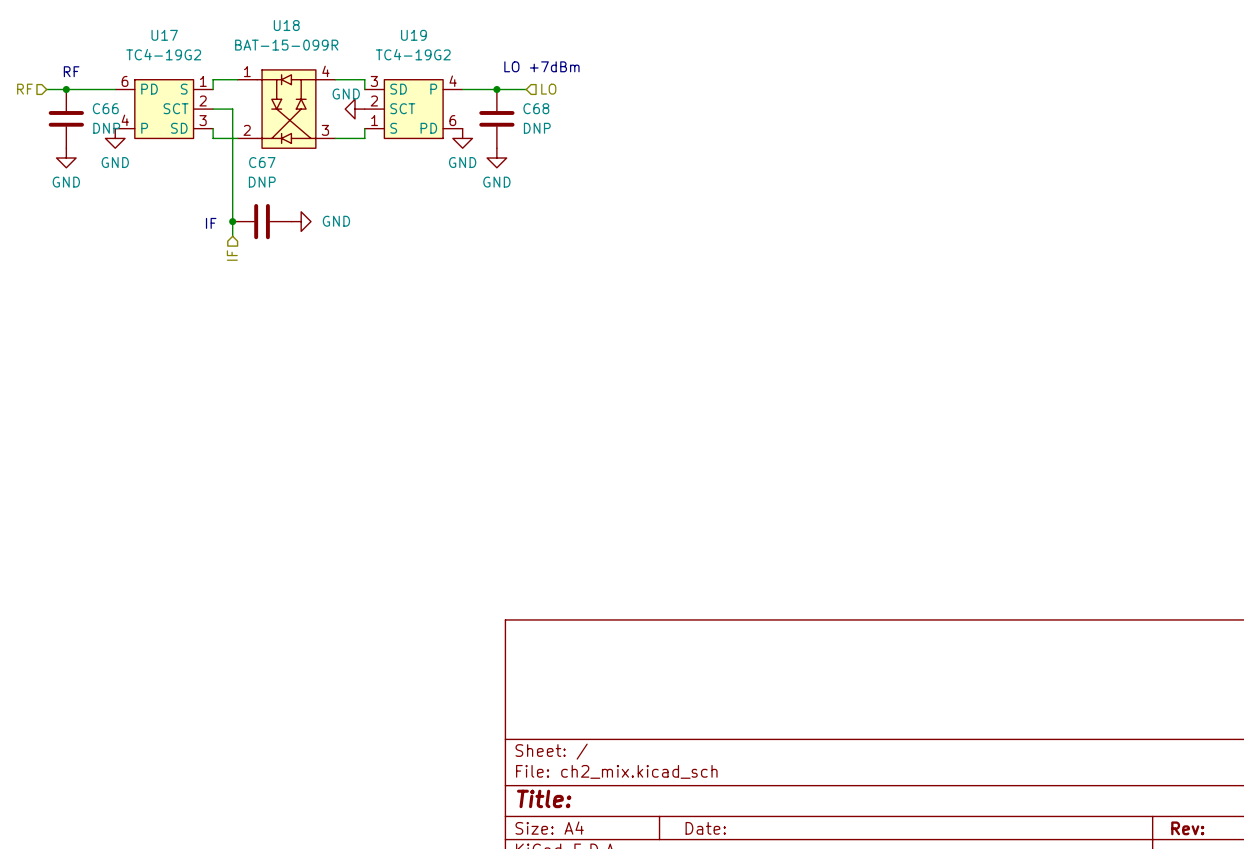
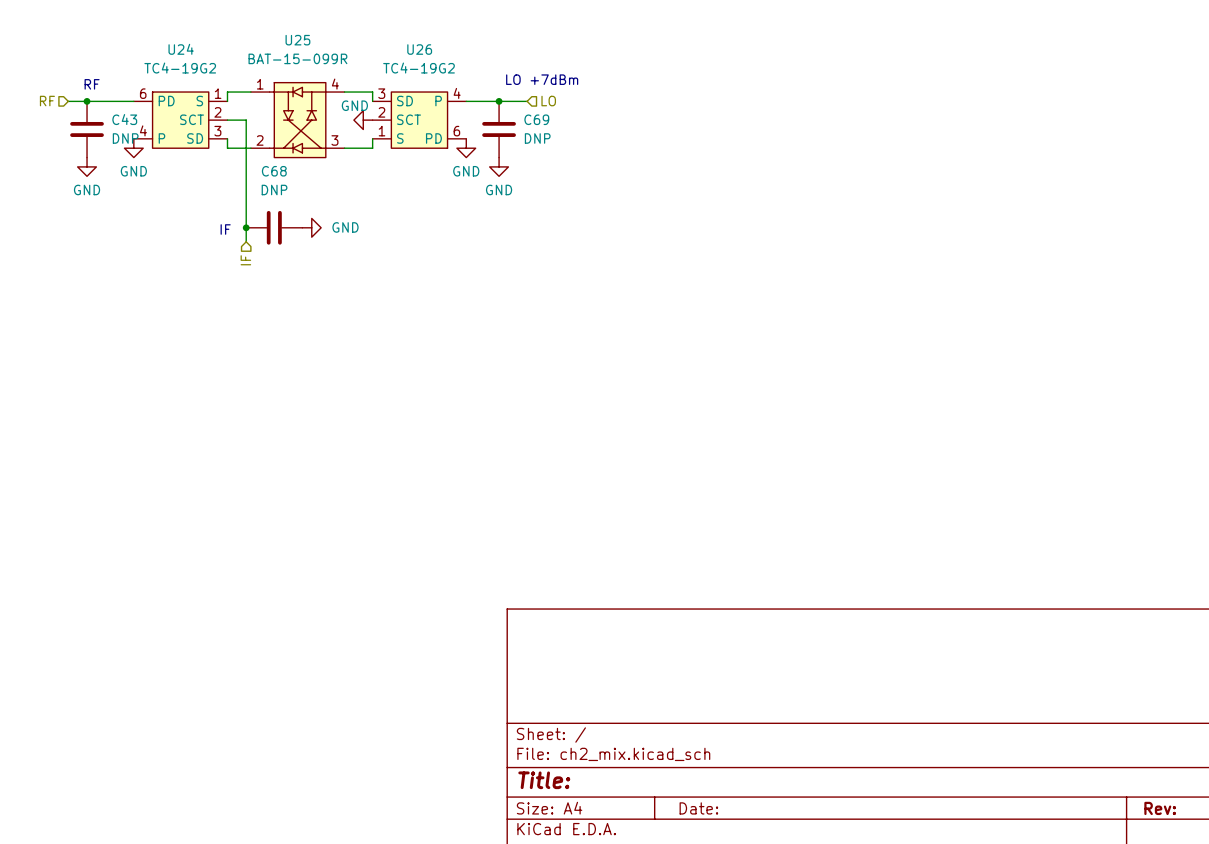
U18 name: U18 (286, 25) -> U25 (297, 40)
U17 name: U17 (164, 35) -> U24 (181, 49)
U19 name: U19 (413, 35) -> U26 (419, 49)
C66 name: C66 (105, 108) -> C43 (124, 119)
C68 name: C68 (536, 108) -> C69 (536, 119)
C67 name: C67 (262, 162) -> C68 (274, 171)

